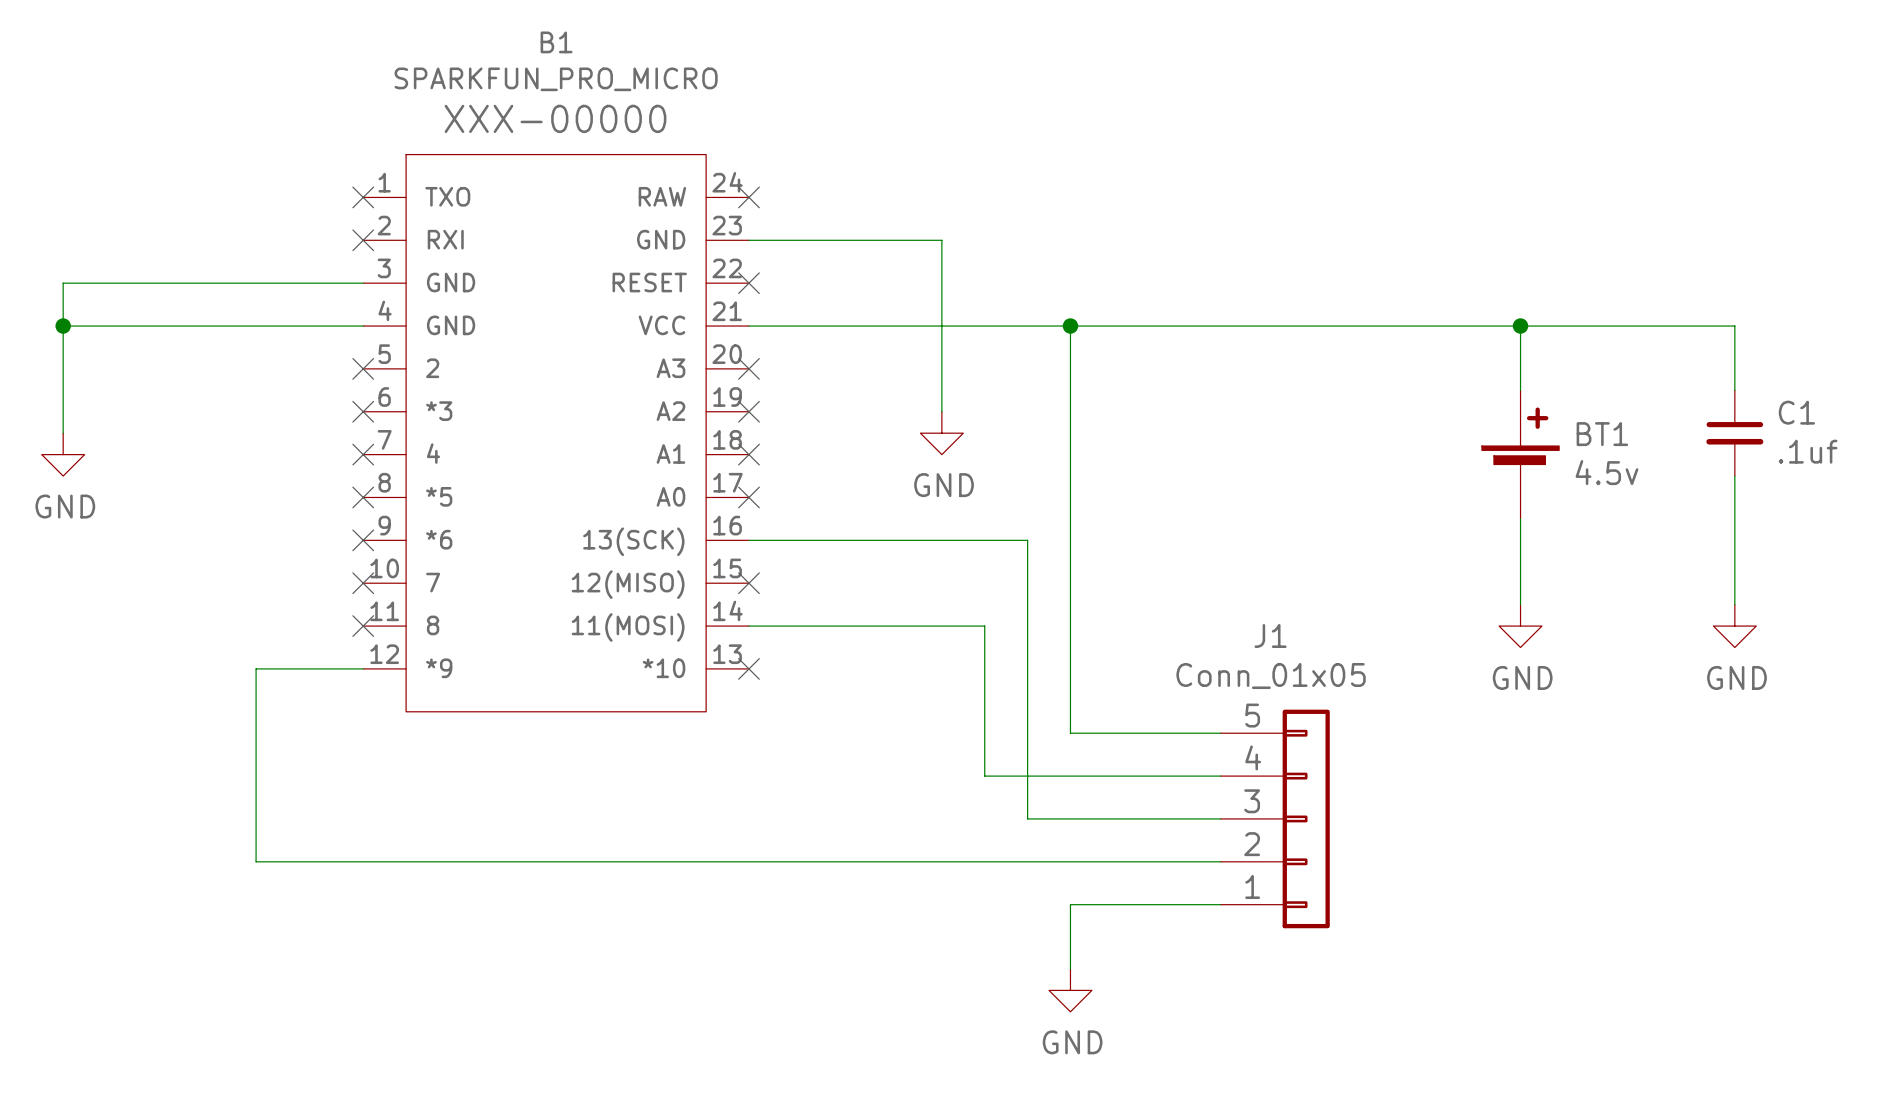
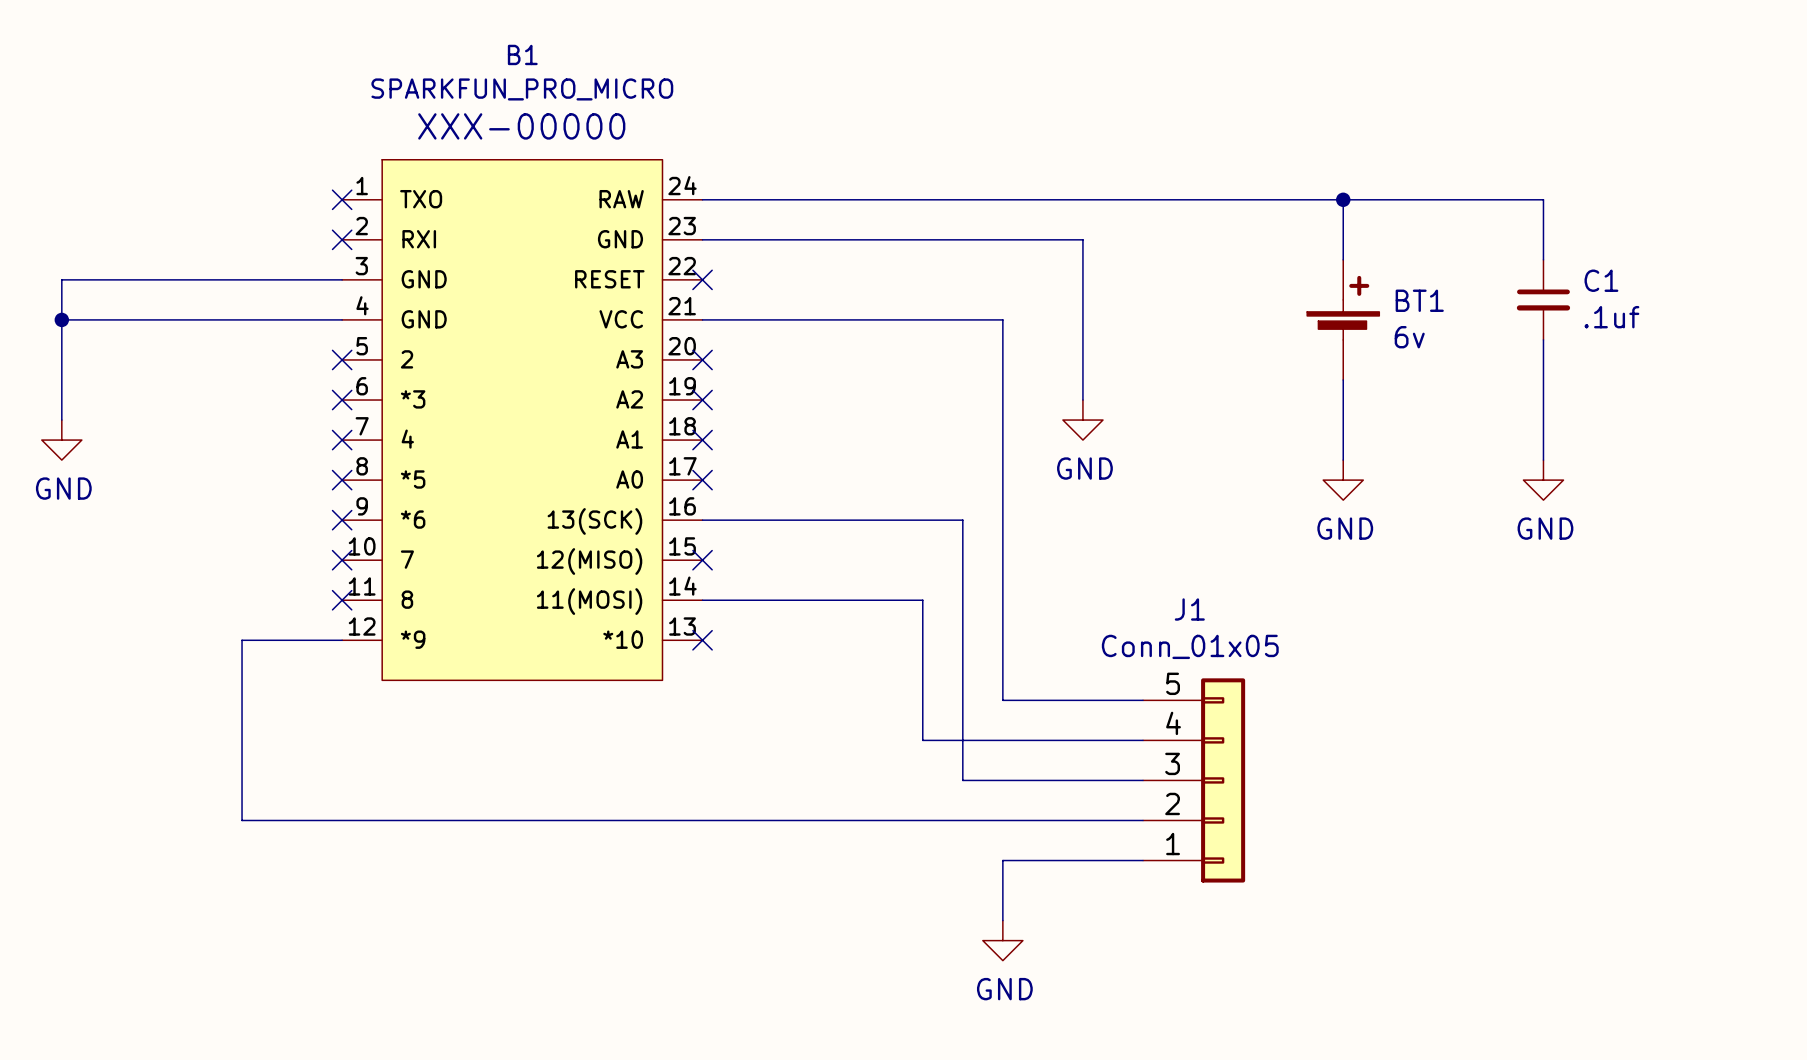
wire: none -> (702, 199) (1543, 199) (1543, 259)
no-connect mark: (748, 197) -> none
junction: none -> (1343, 199)
wire: (941, 240) (941, 411) -> (882, 239) (1082, 239) (1082, 400)
wire: (1070, 326) (1734, 326) (1734, 390) -> none
junction: (1070, 326) -> none
wire: (1520, 326) (1520, 390) -> (1343, 199) (1343, 259)
junction: (1520, 326) -> none
power symbol: GND (941, 433) -> none
power symbol: none -> GND (1082, 420)
C1 position: (1734, 433) -> (1543, 299)
BT1 position: (1520, 454) -> (1343, 319)
BT1 value: 4.5v (1606, 472) -> 6v (1409, 337)
wire: (1734, 476) (1734, 604) -> (1543, 339) (1543, 460)
power symbol: none -> GND (1343, 480)
power symbol: none -> GND (1543, 480)
wire: (1520, 518) (1520, 604) -> (1343, 379) (1343, 460)
power symbol: GND (1520, 626) -> none
power symbol: GND (1734, 626) -> none

